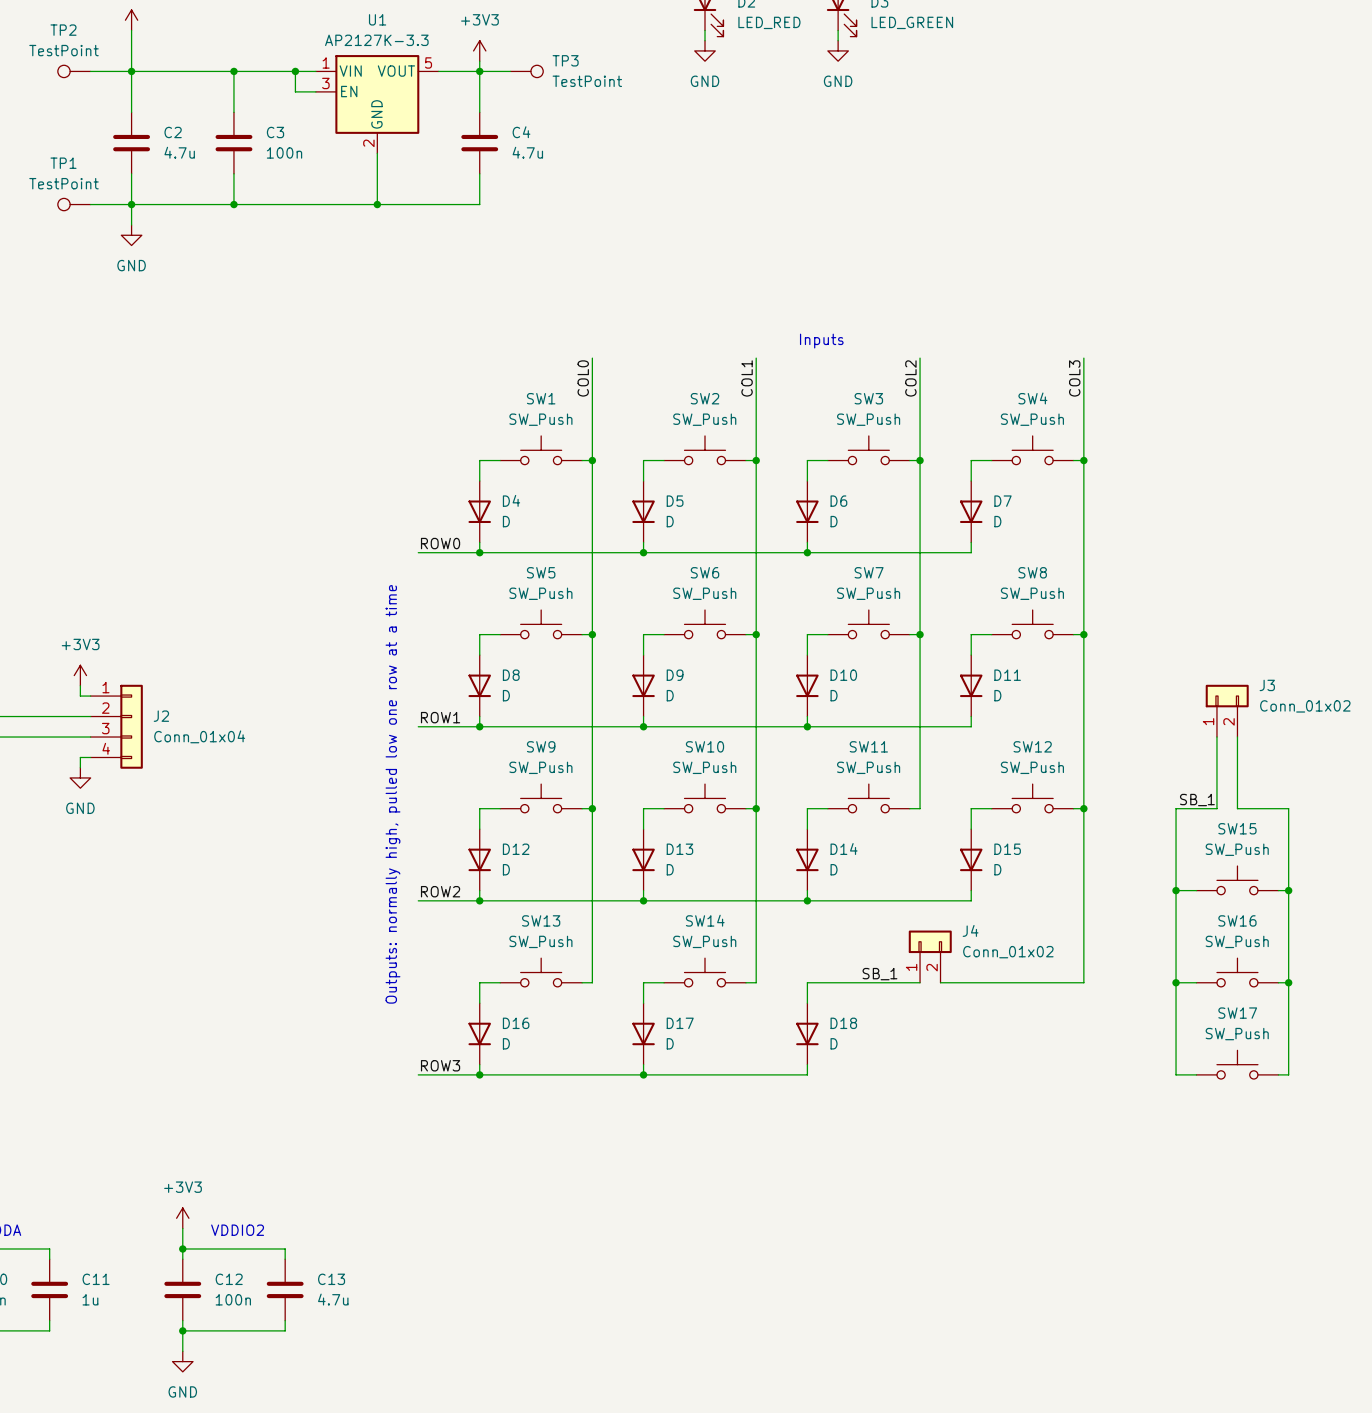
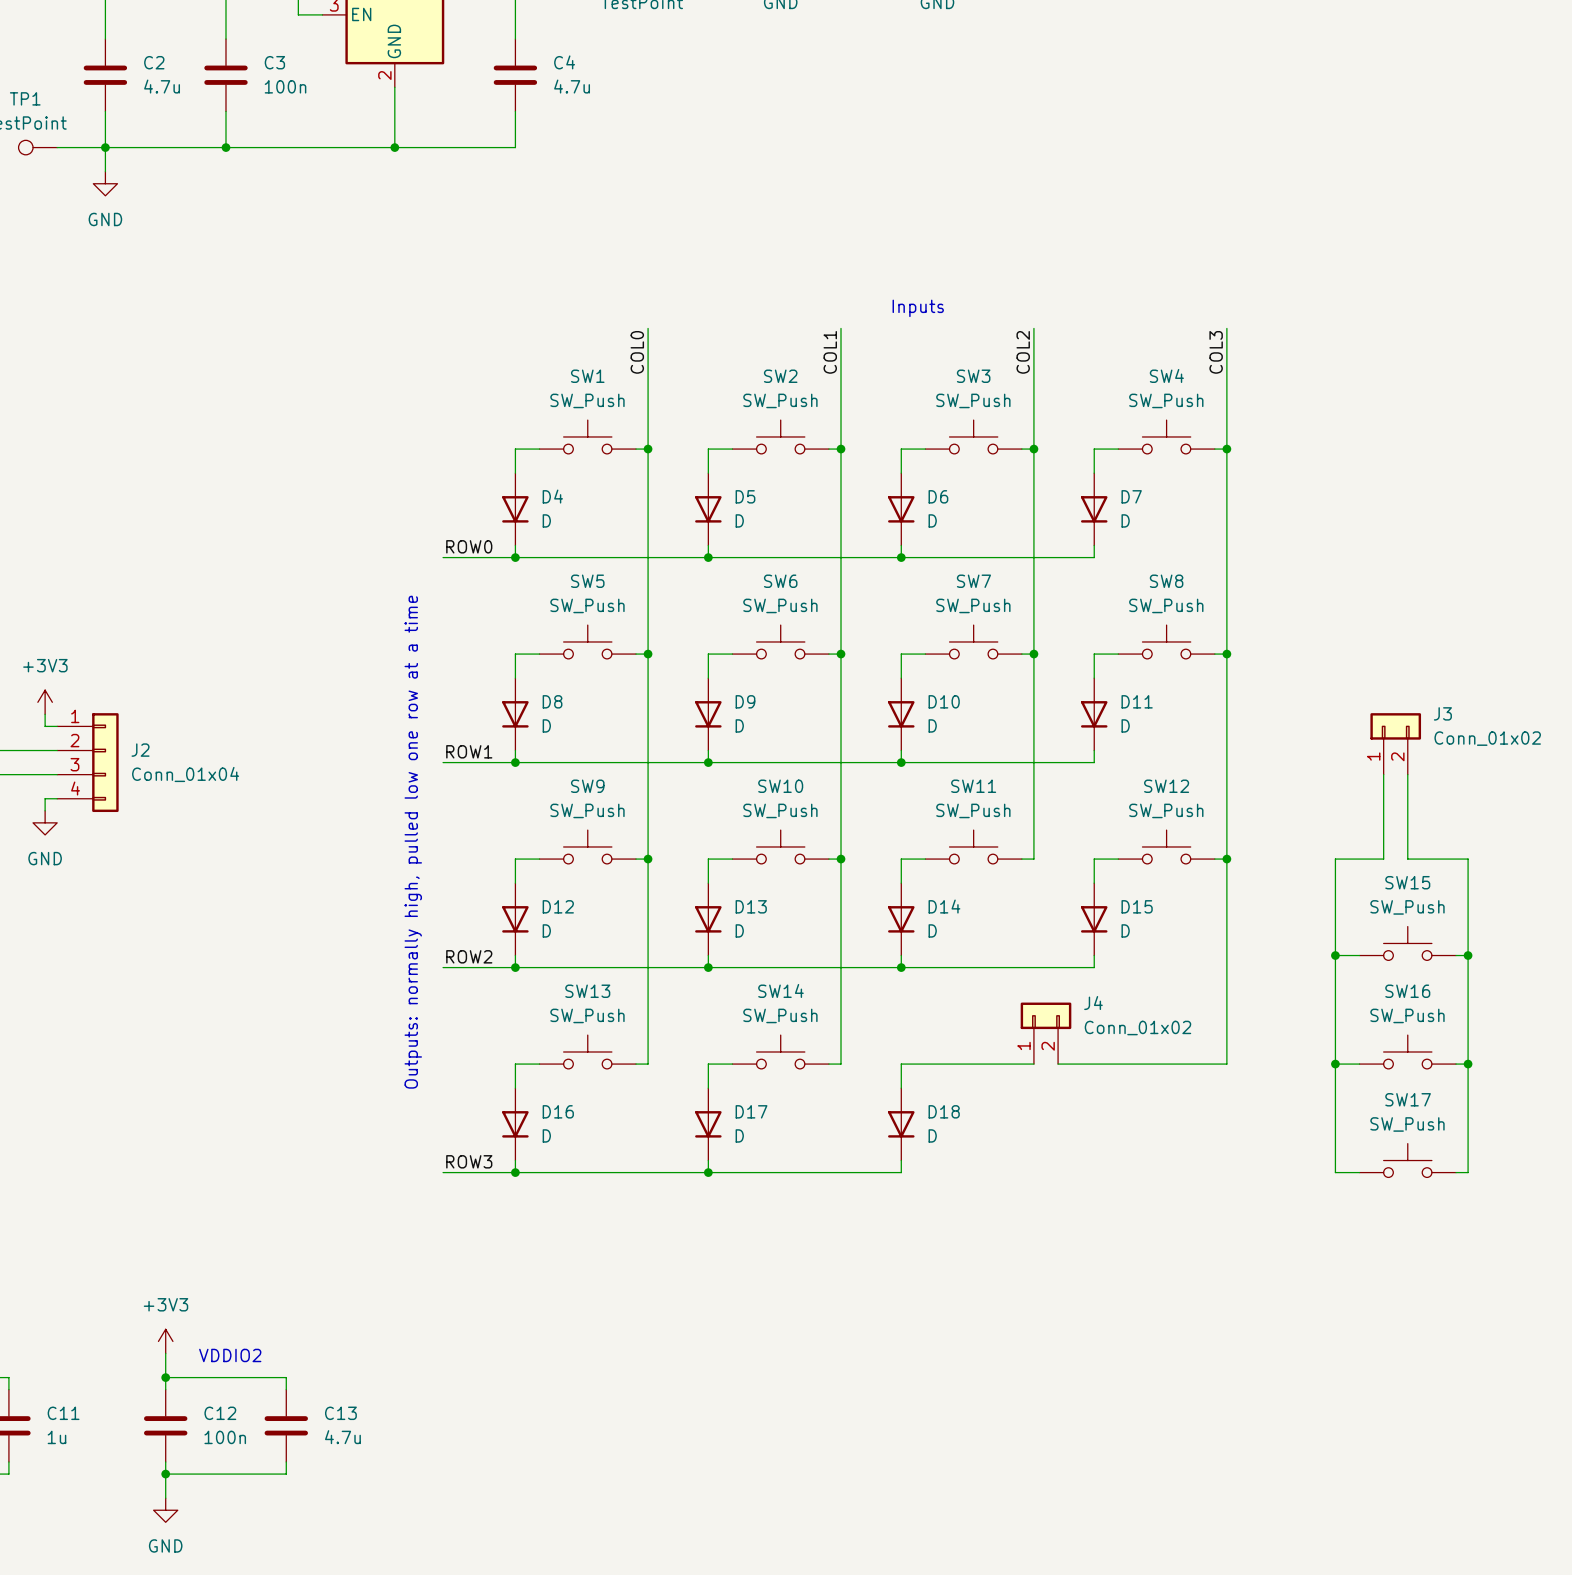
label: SB_1 (1197, 800) -> none
label: SB_1 (879, 974) -> none

